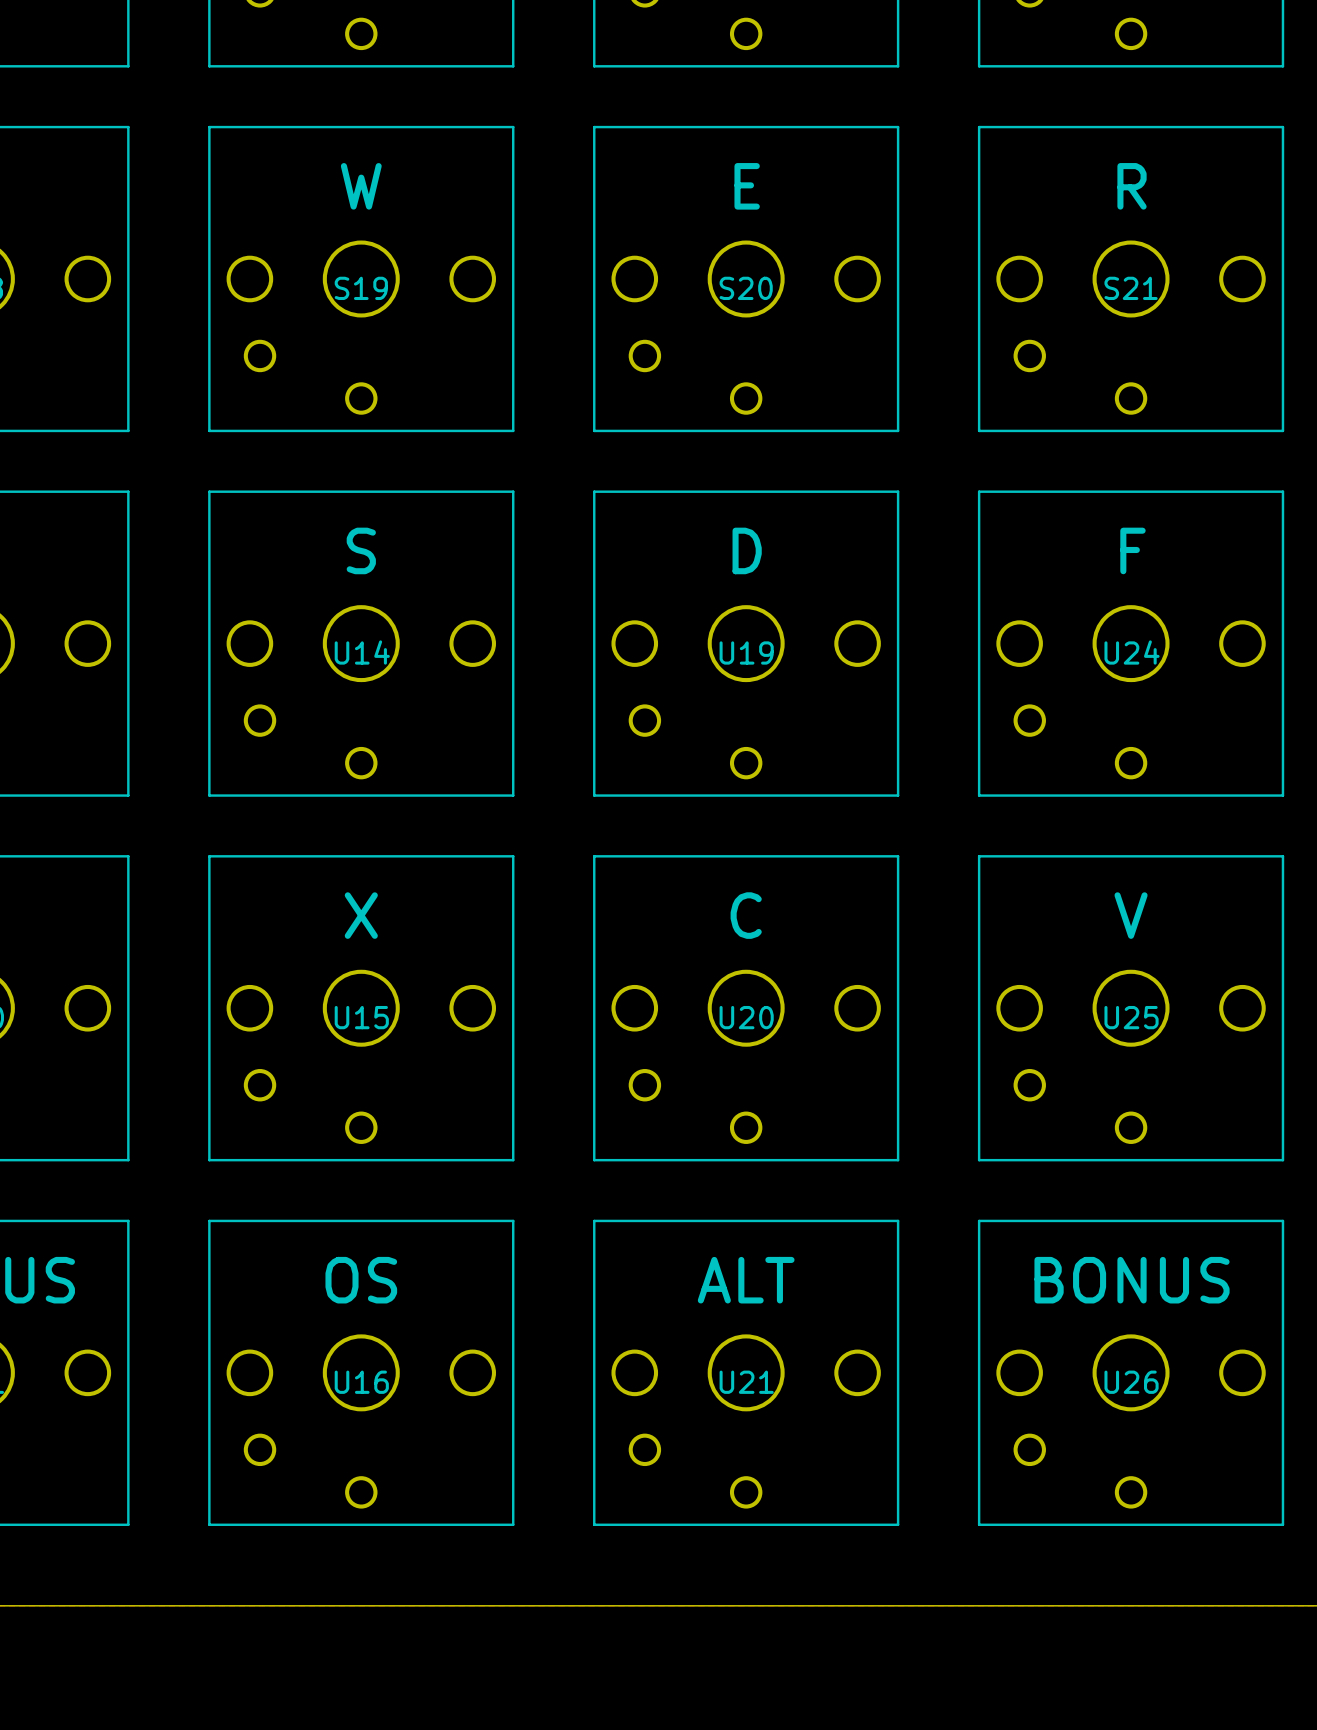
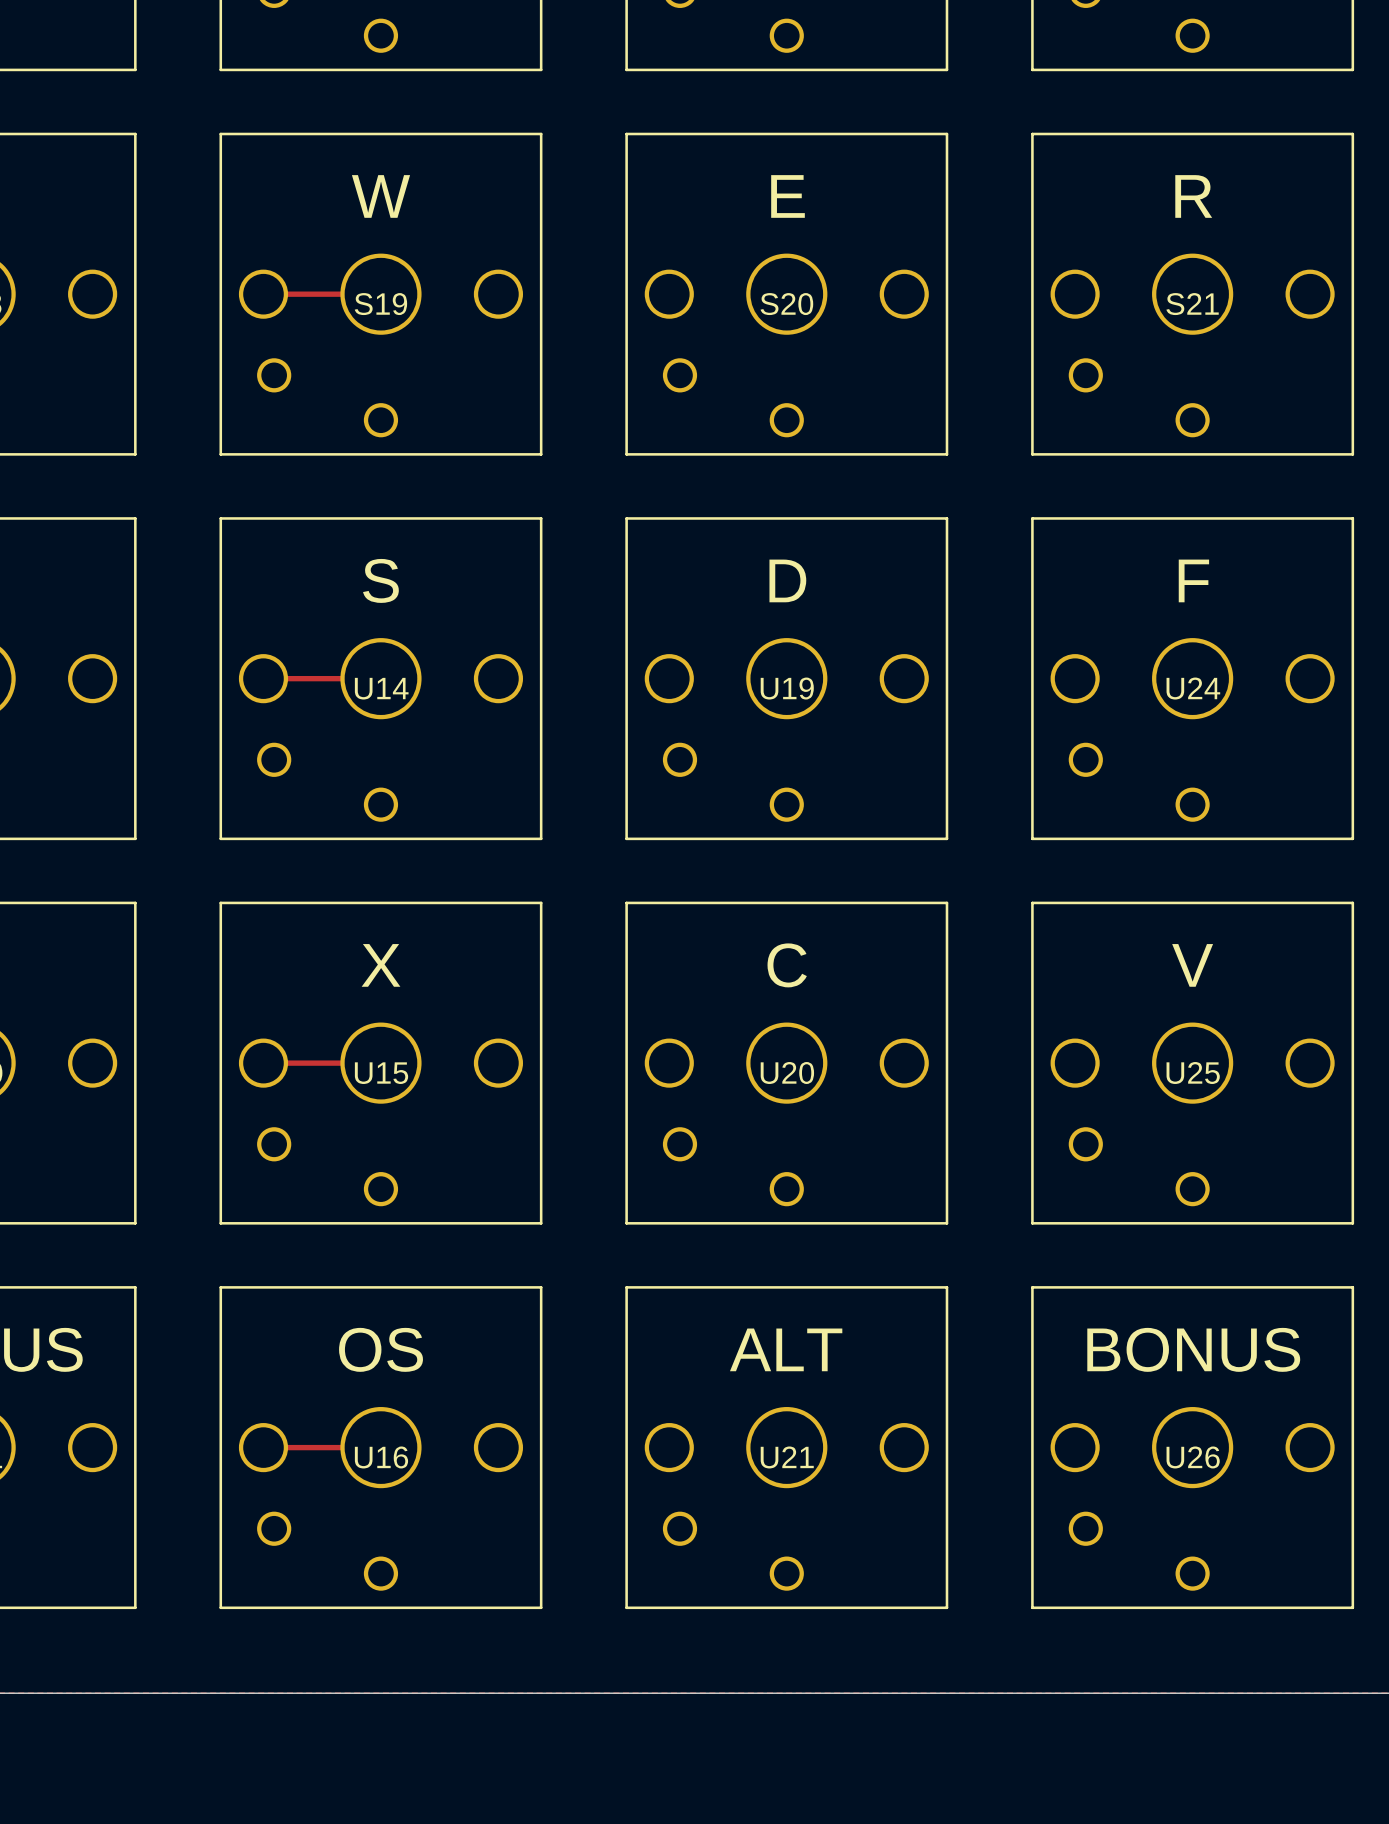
track: none -> (263, 294) (380, 294)
track: none -> (263, 678) (380, 678)
track: none -> (263, 1063) (380, 1063)
track: none -> (263, 1447) (380, 1447)

